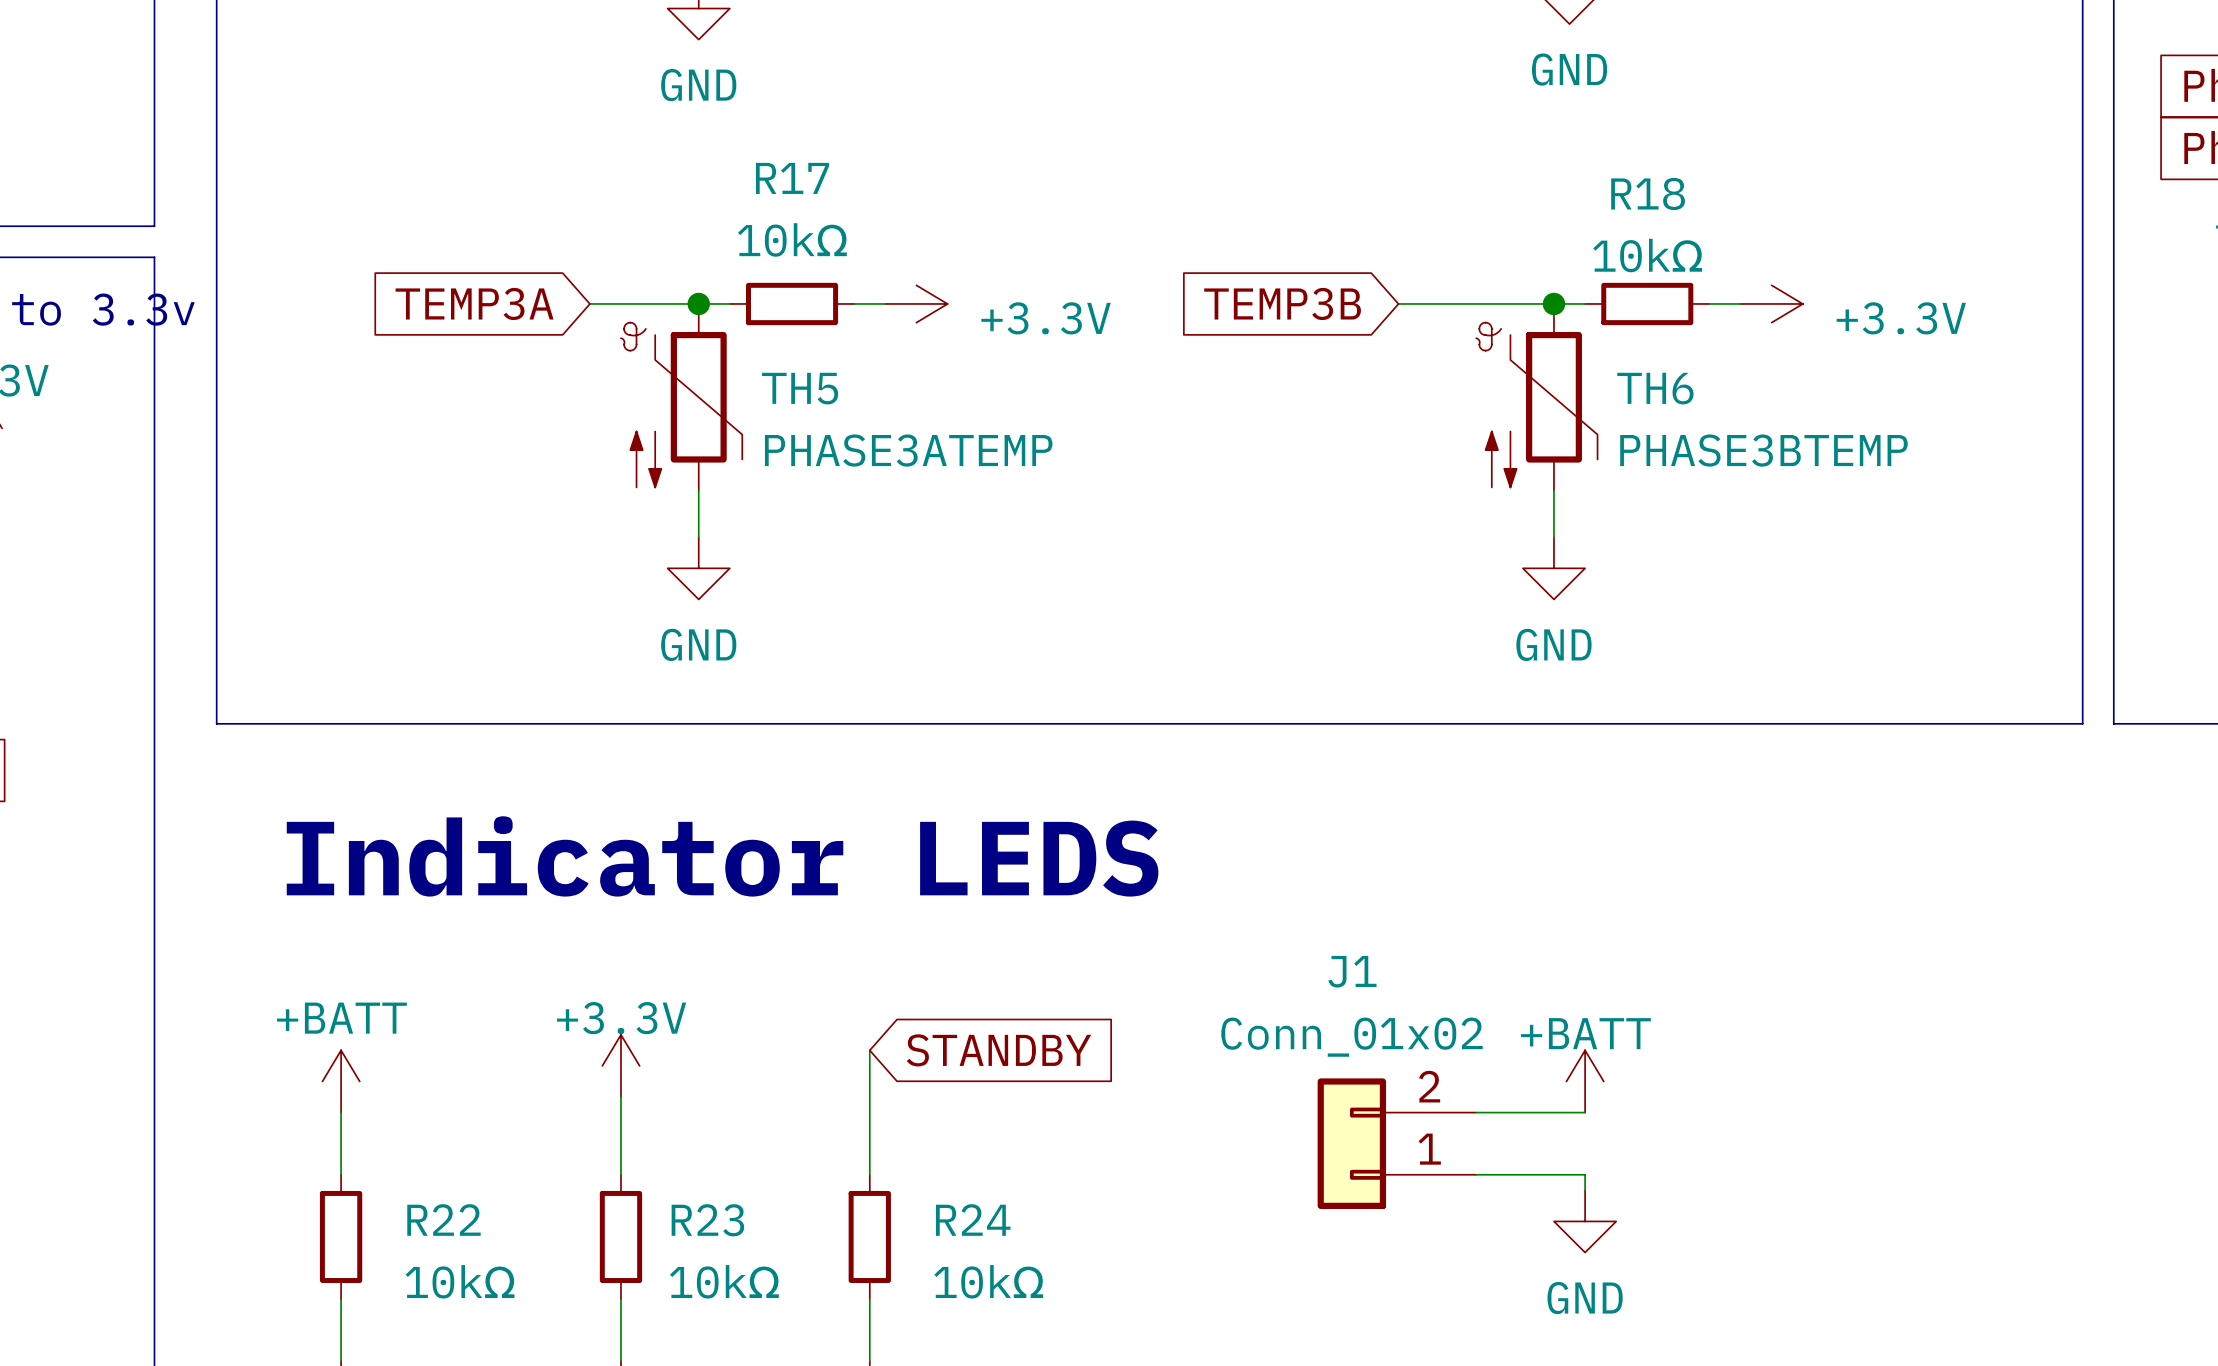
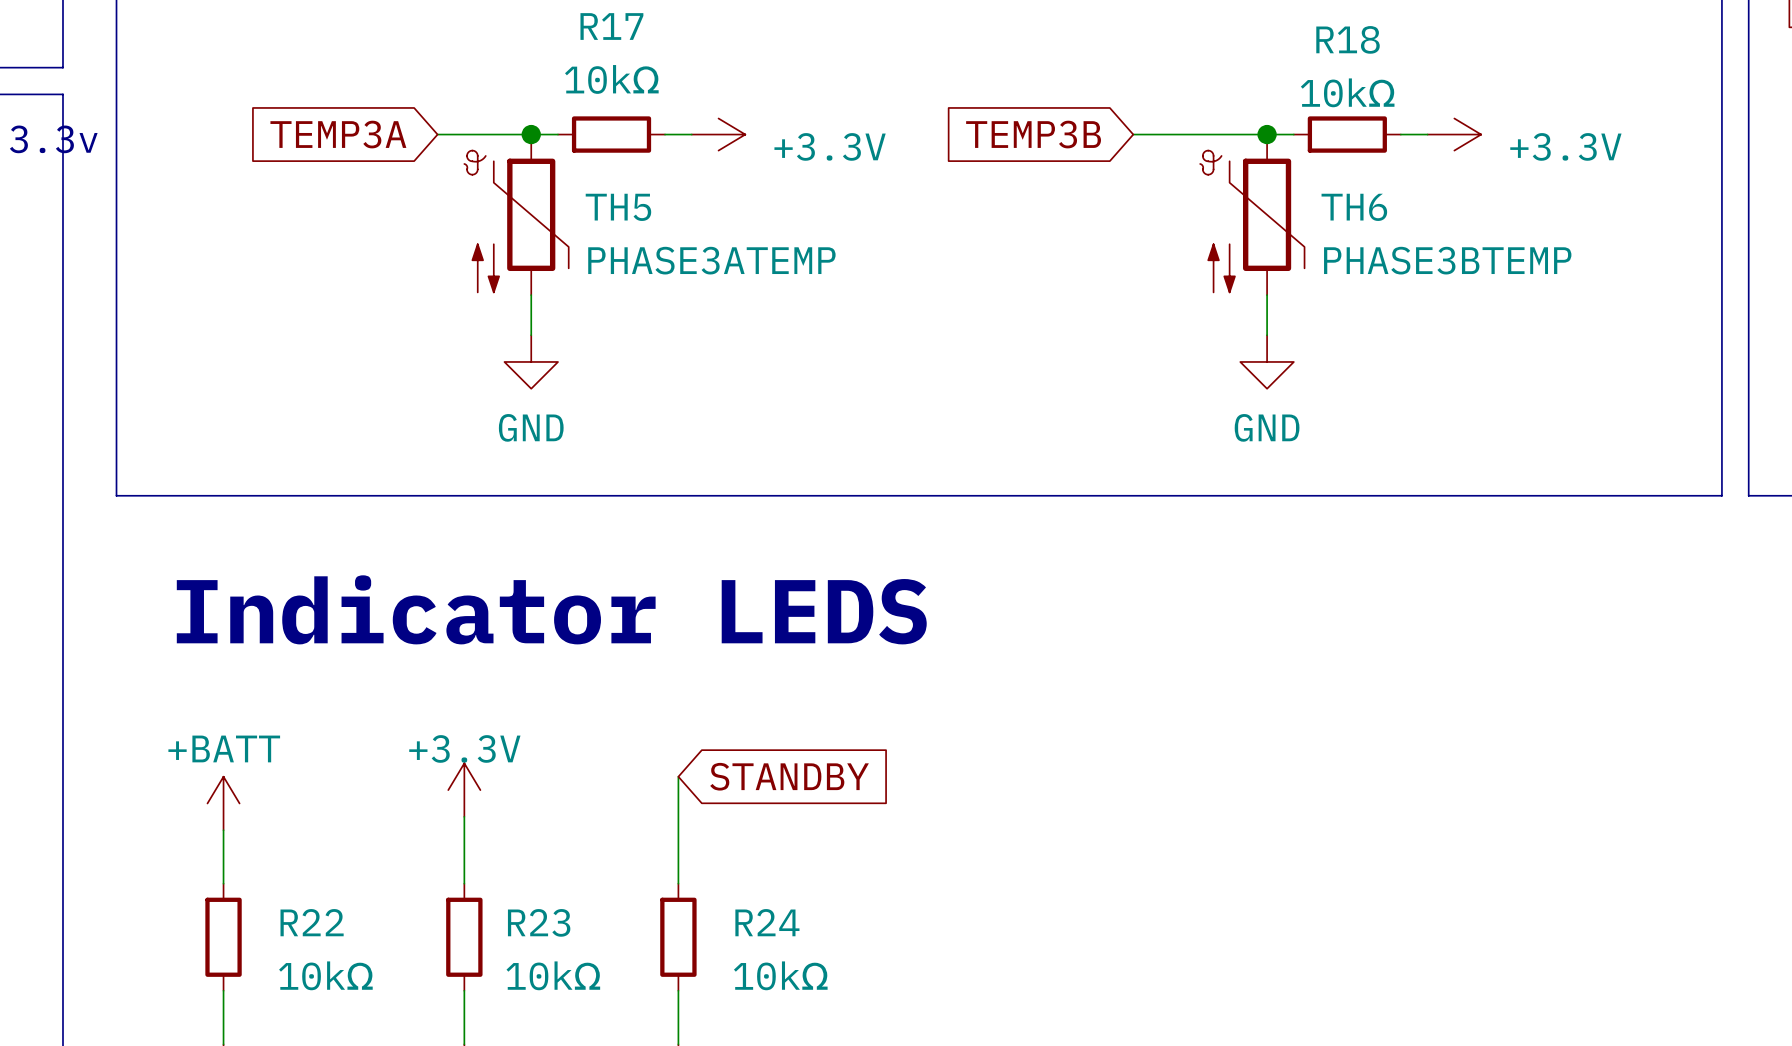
power symbol: +BATT (1585, 1081) -> none
wire: (1476, 1112) (1585, 1112) -> none
J1: Conn_01x02 (1396, 1143) -> none
wire: (1476, 1174) (1585, 1174) (1585, 1190) -> none
power symbol: GND (1585, 1221) -> none

